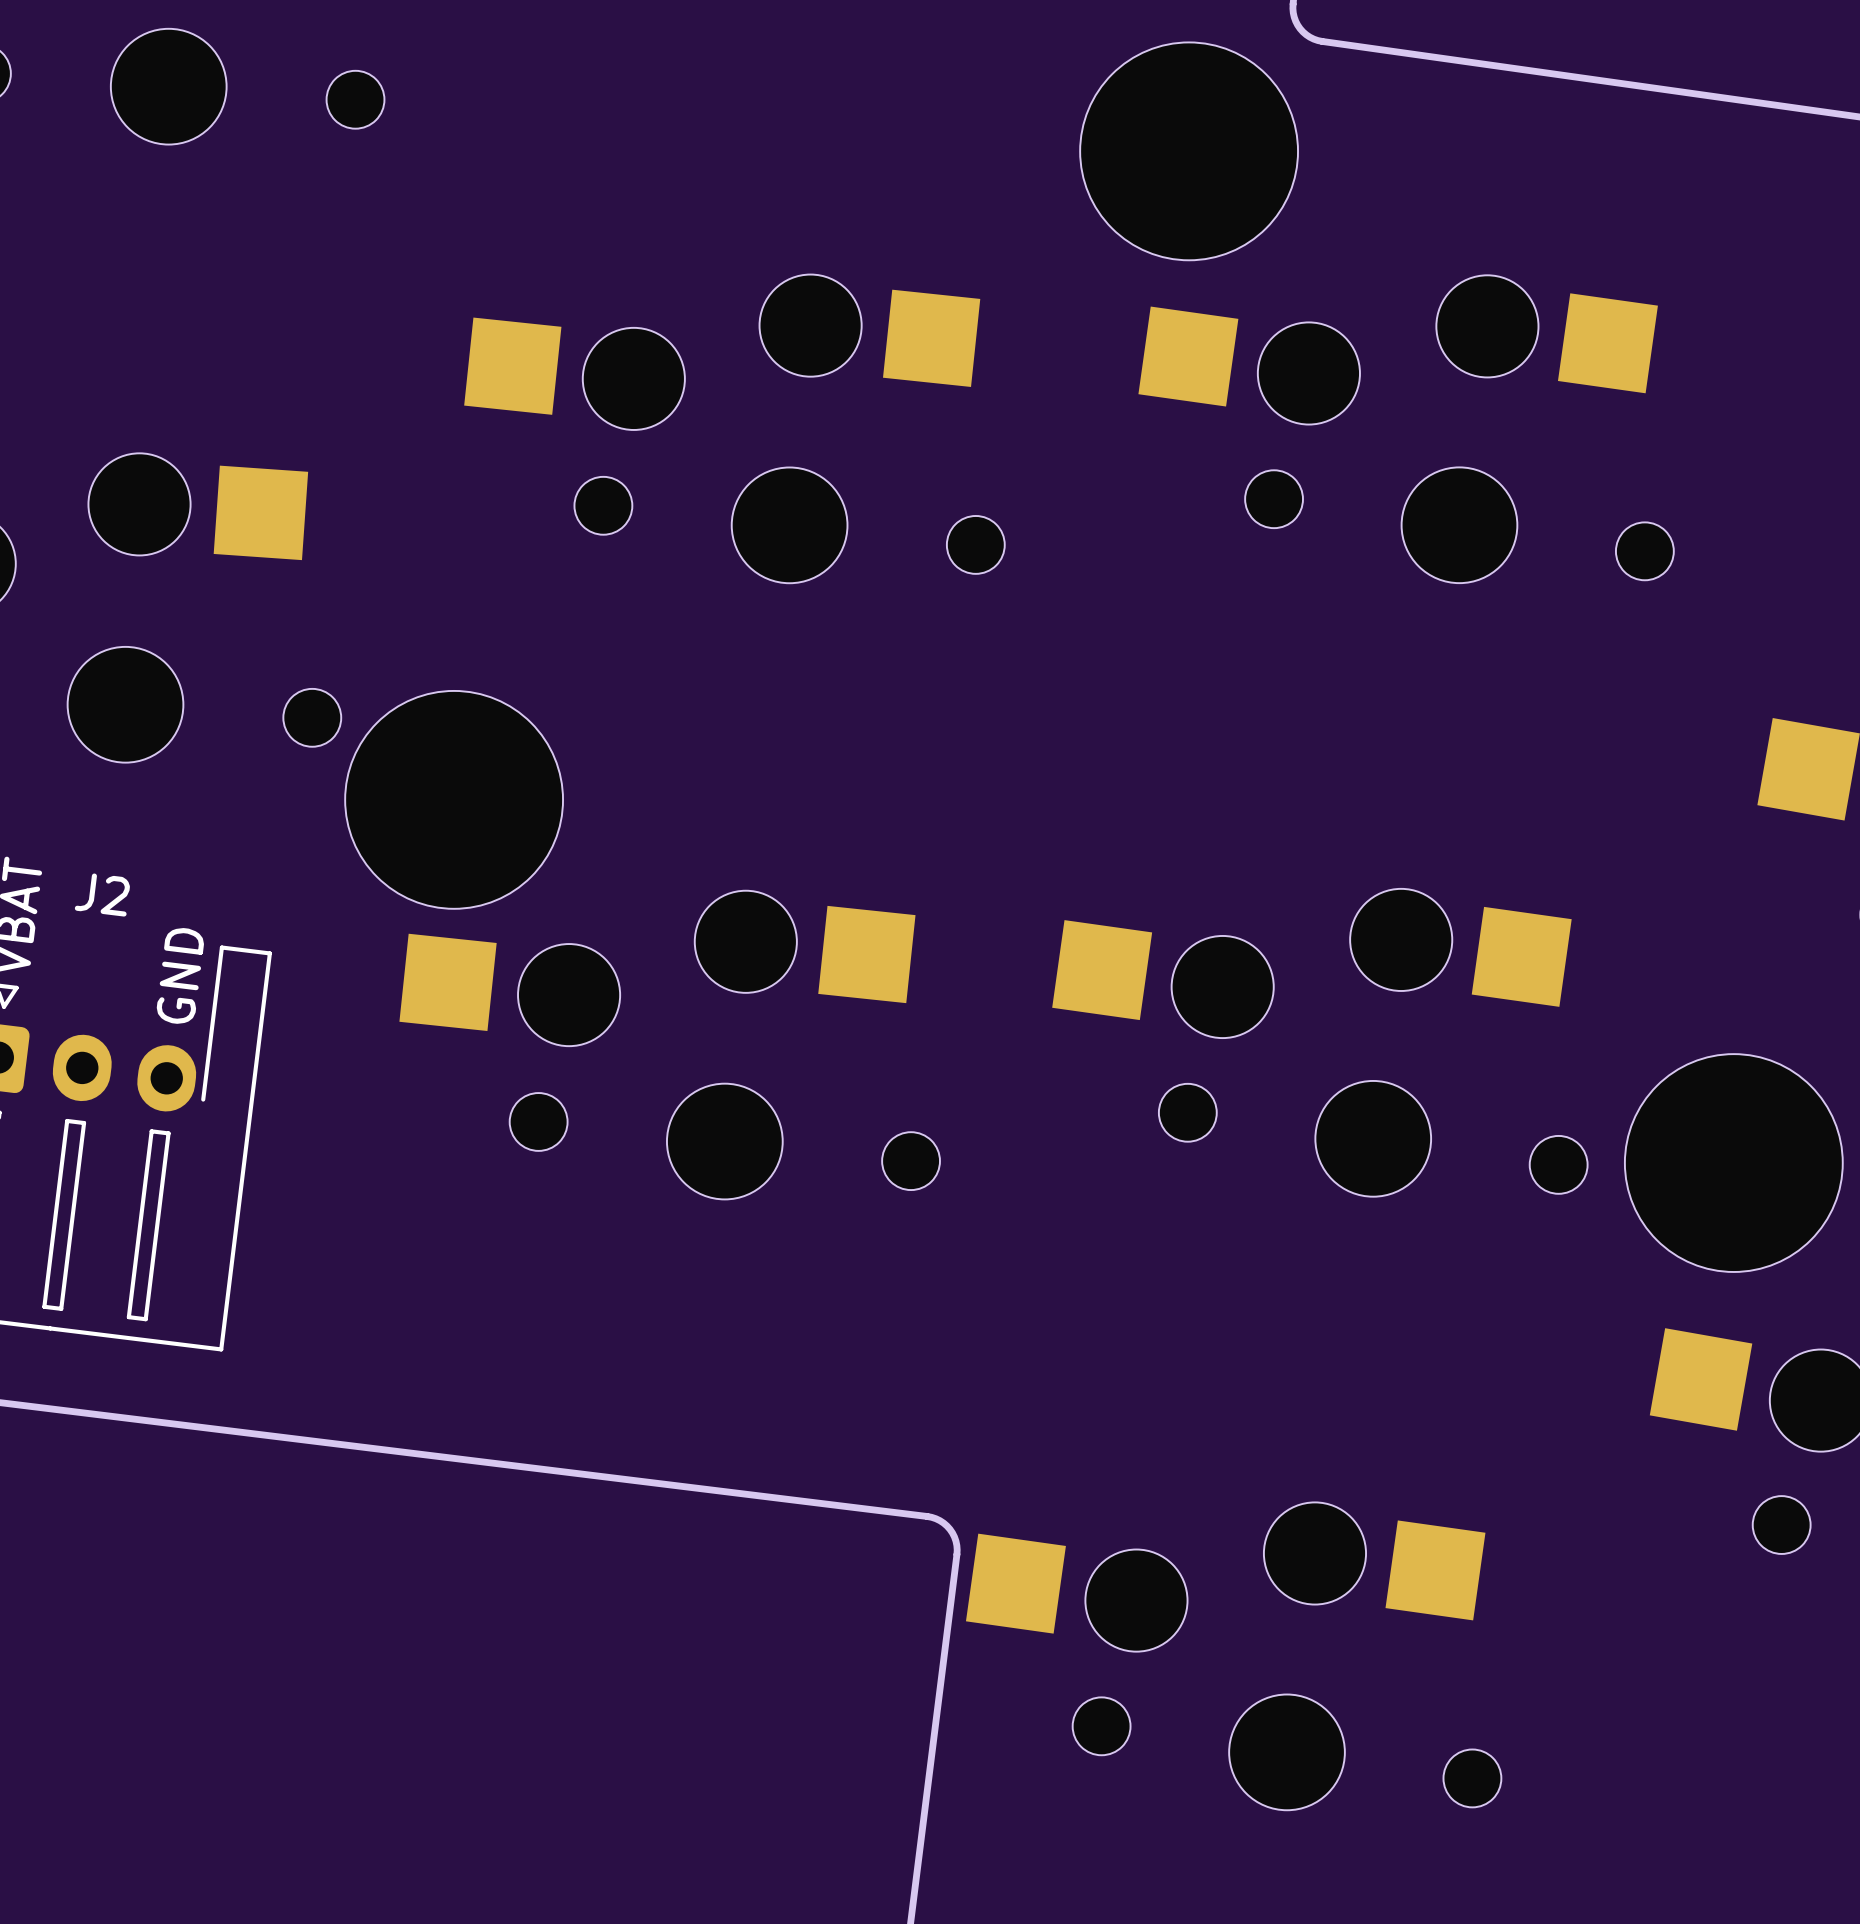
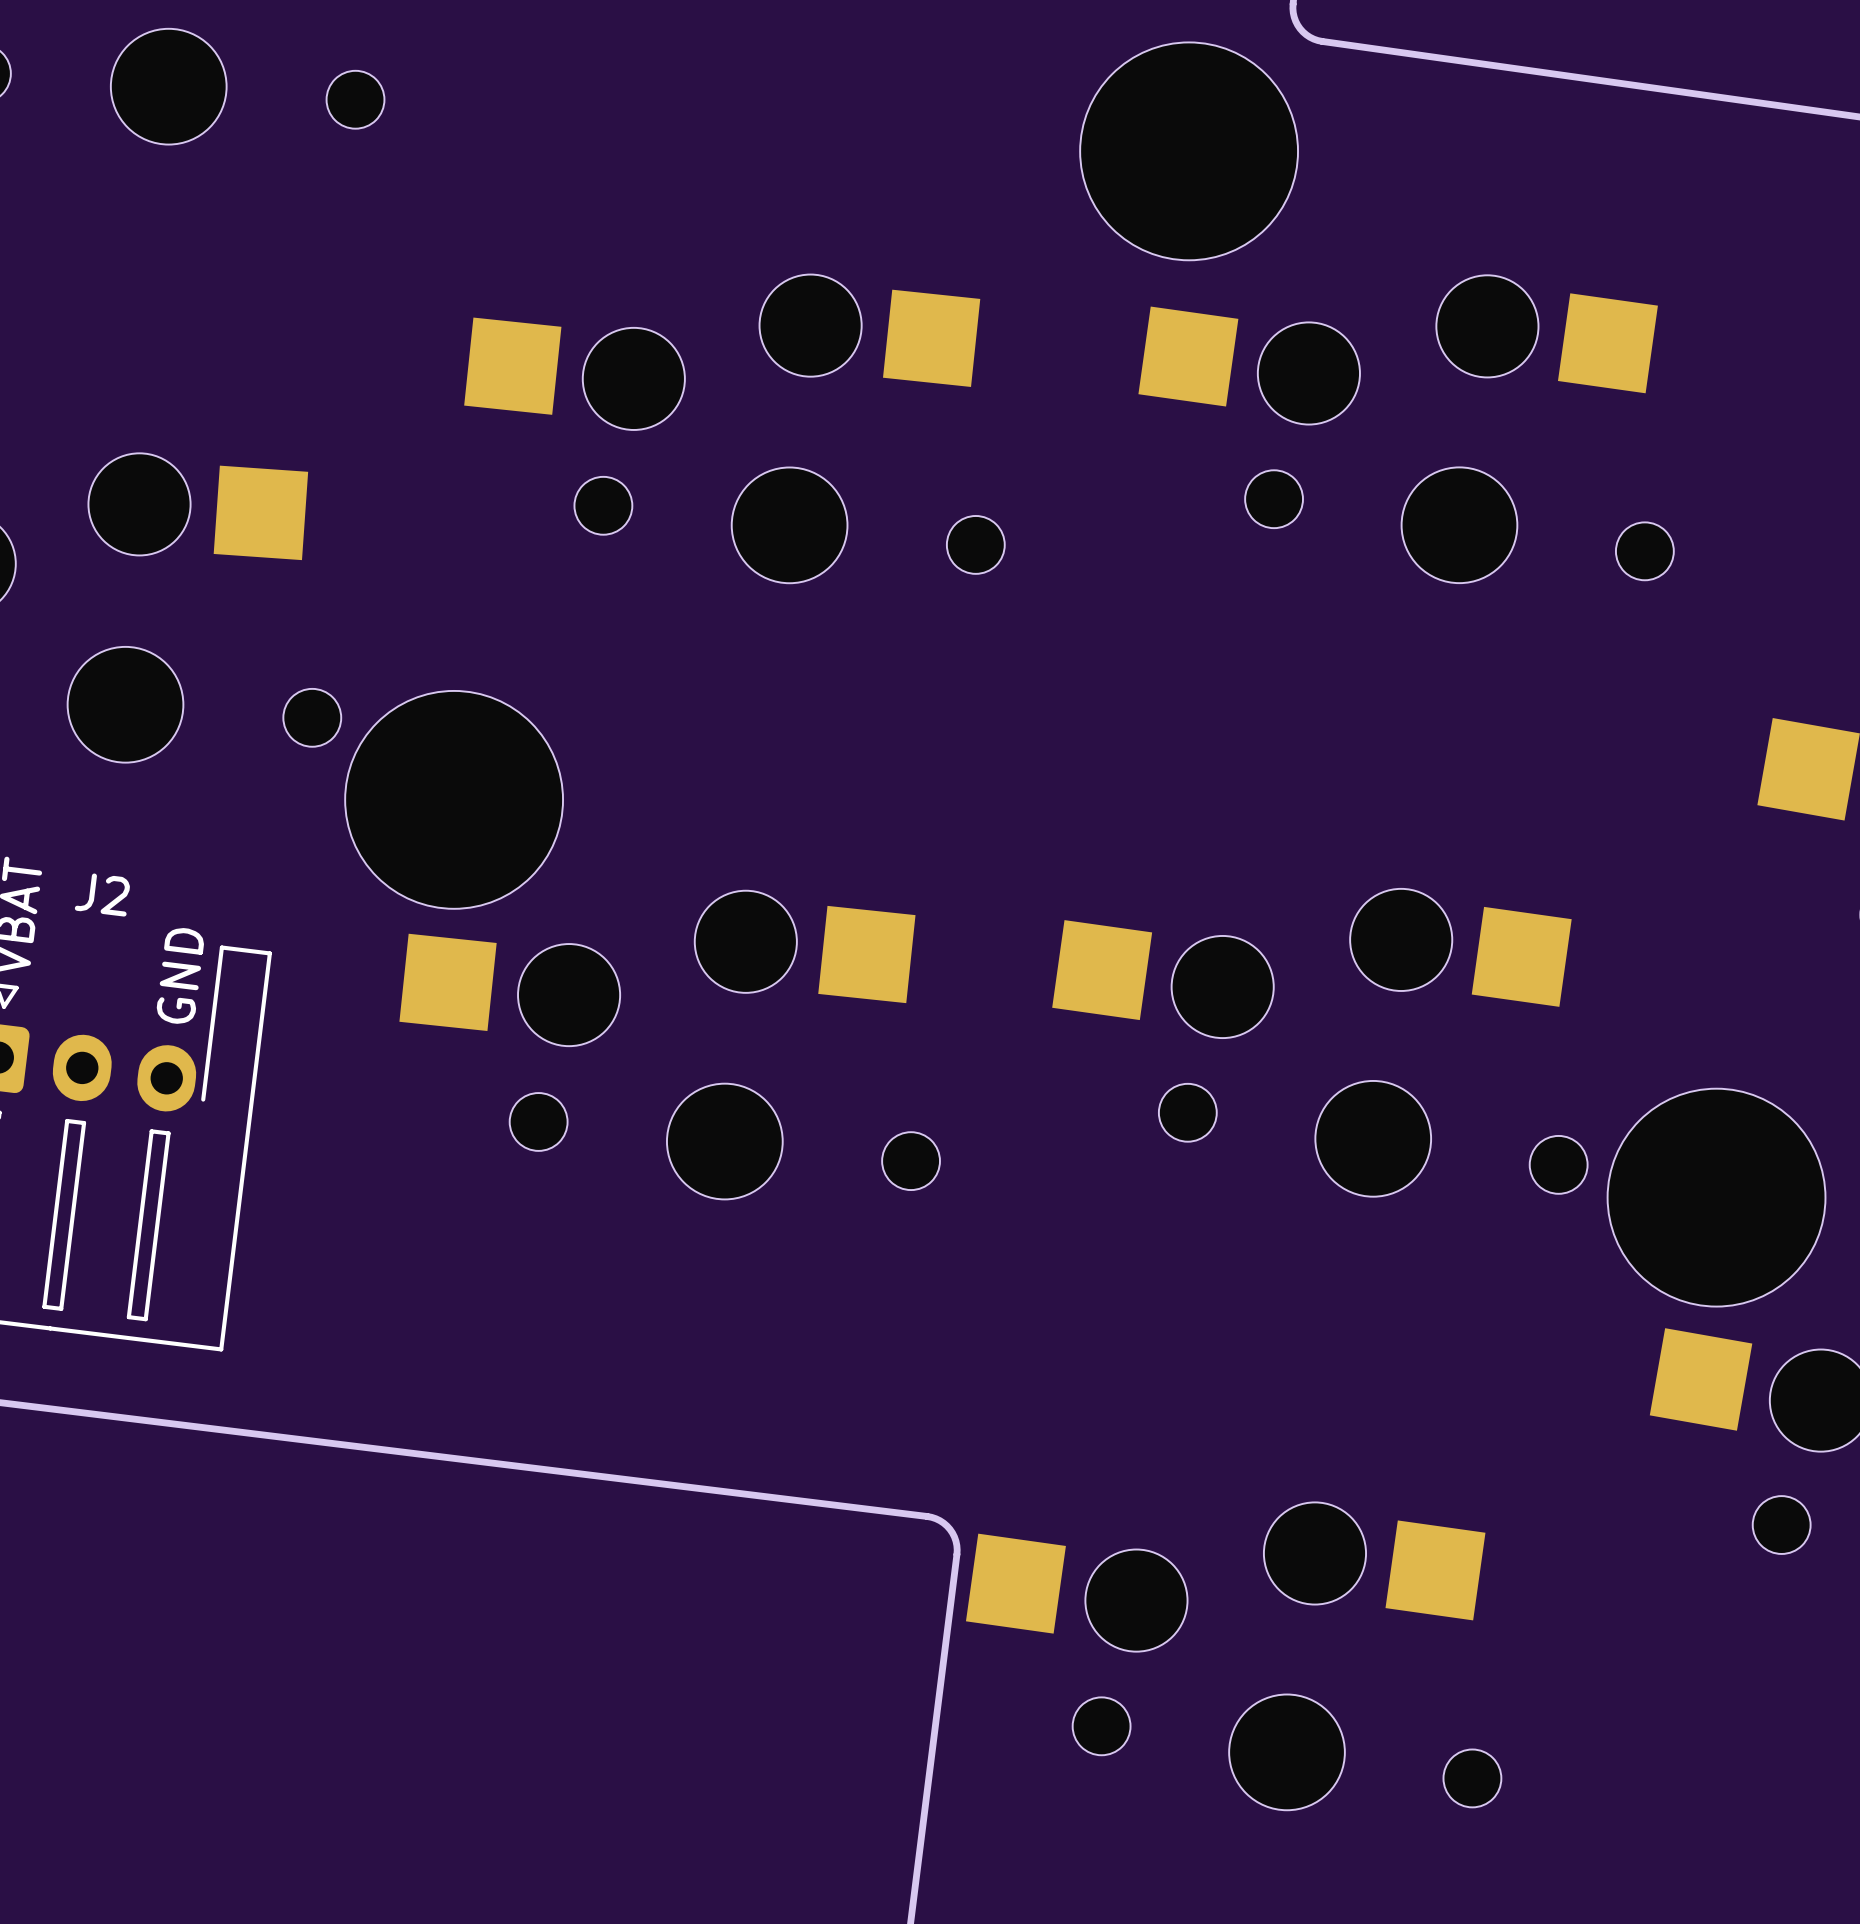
part position: (1733, 1163) -> (1716, 1197)

